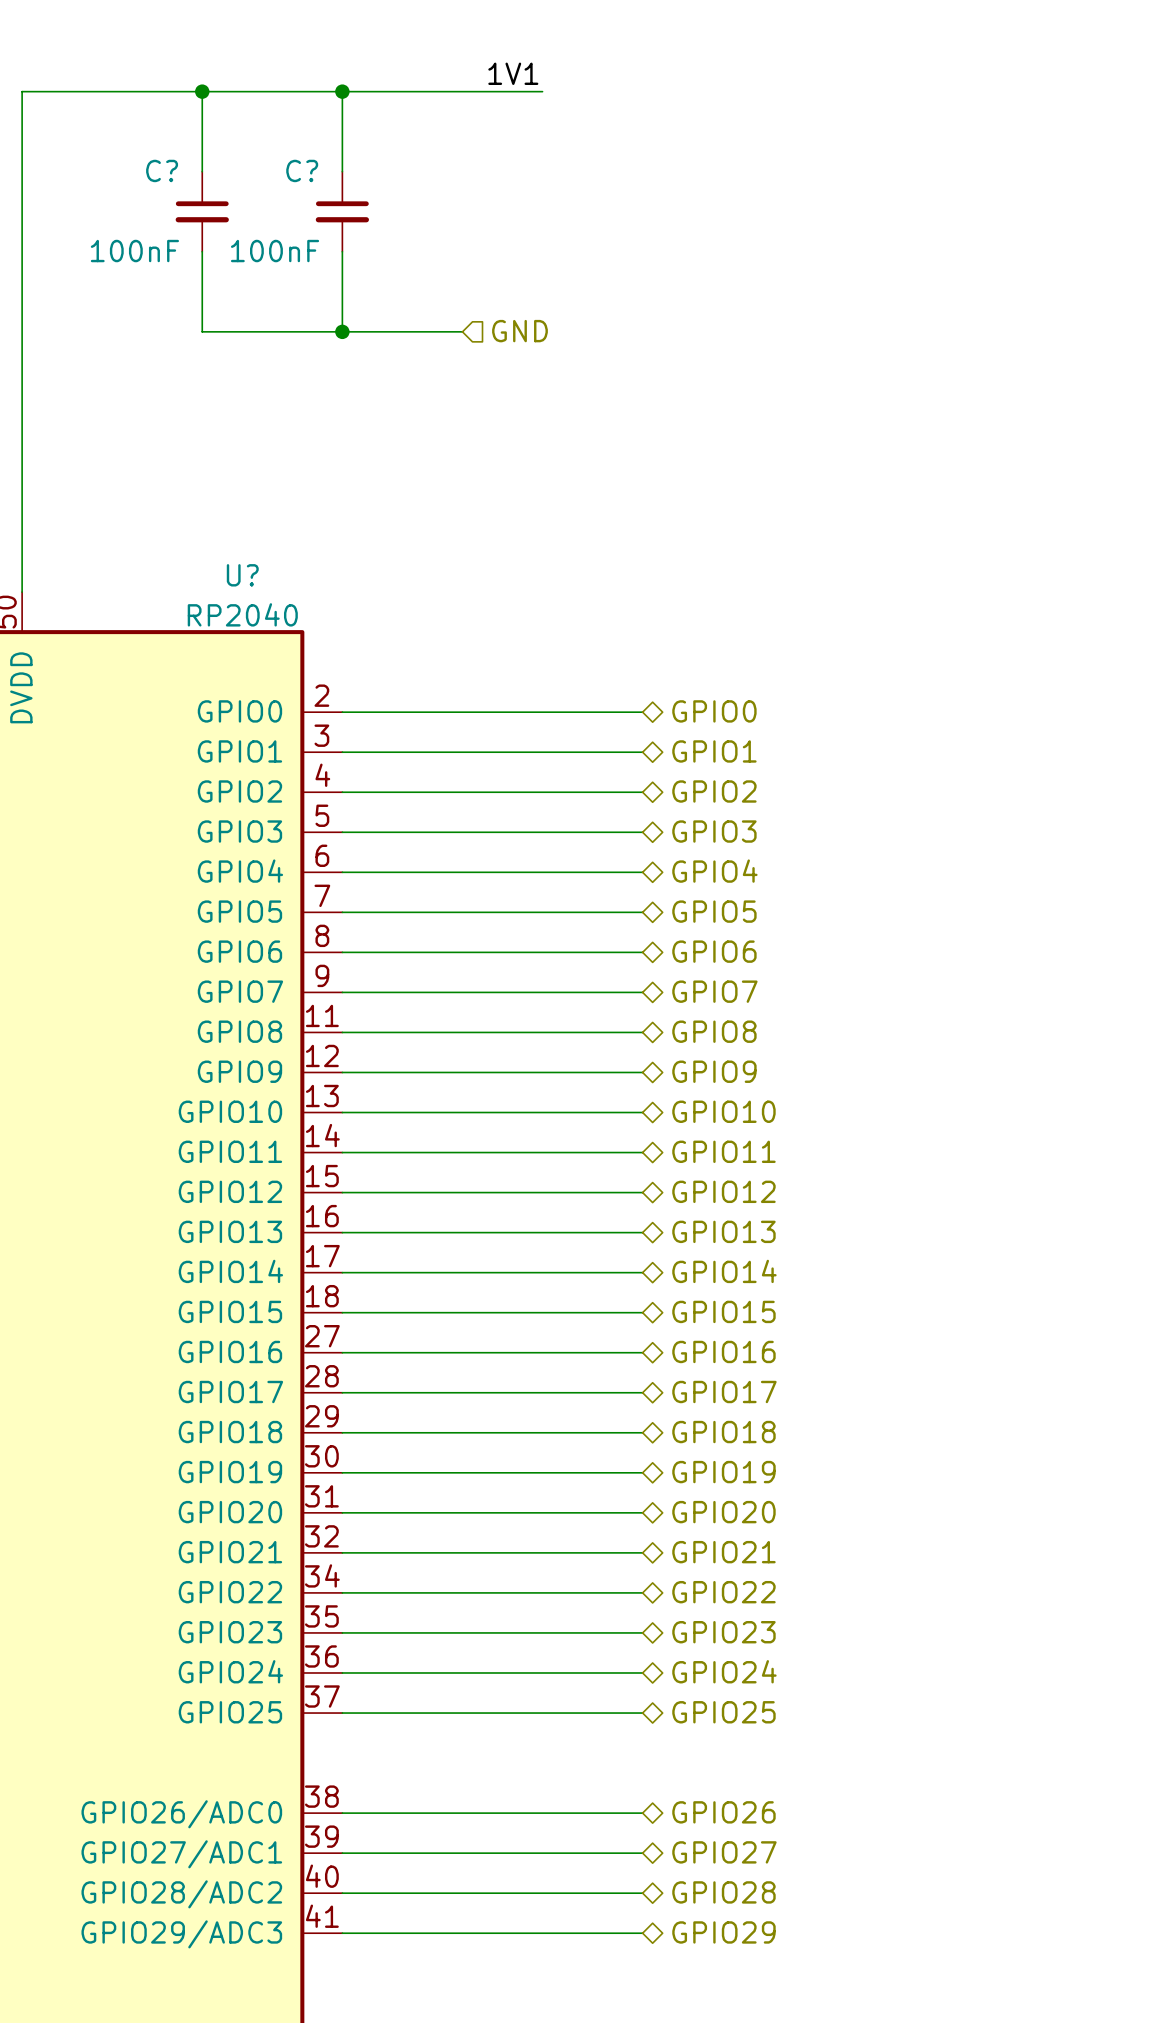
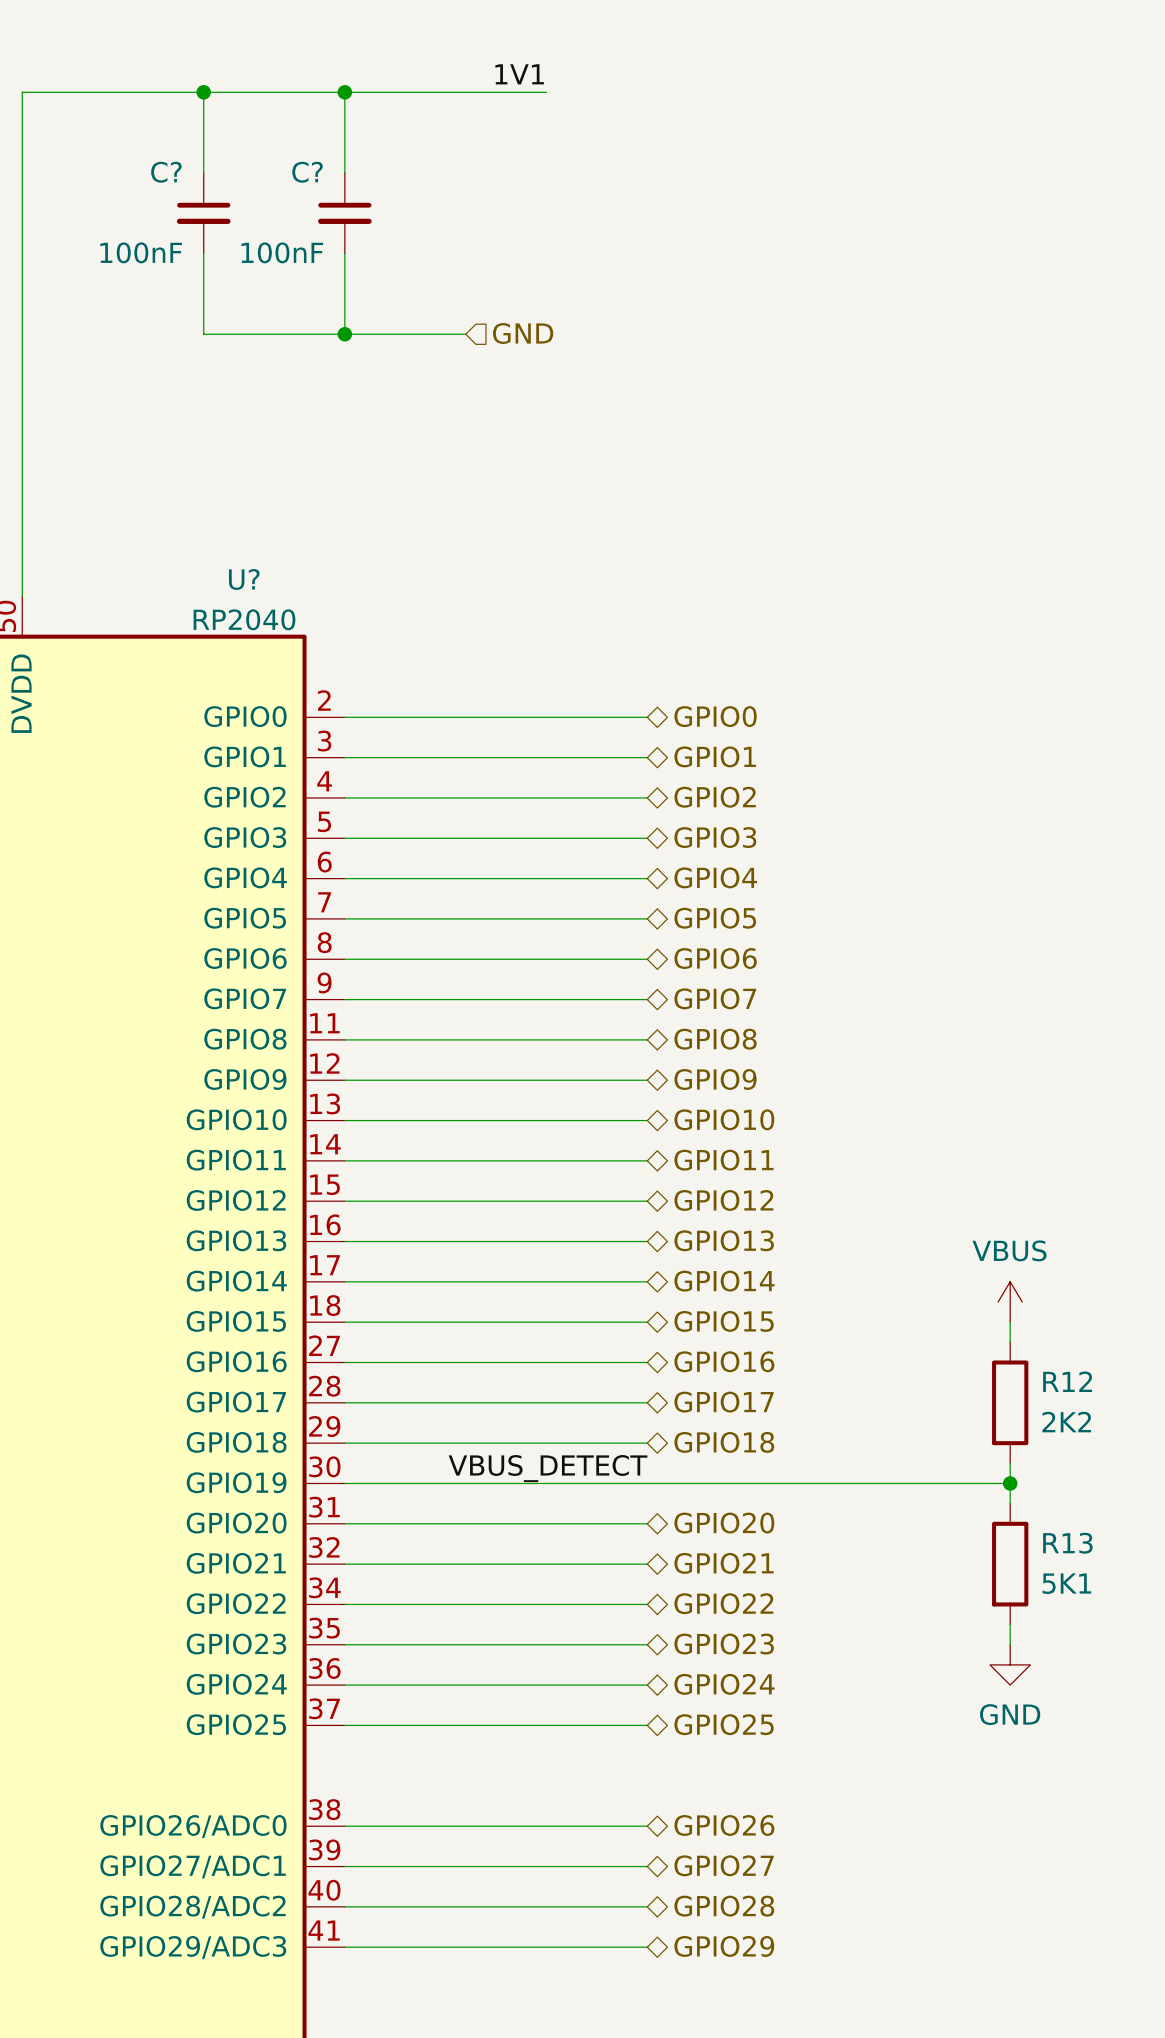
power symbol: none -> VBUS (1010, 1302)
wire: none -> (1010, 1322) (1010, 1342)
R12: none -> 2K2 (1010, 1402)
wire: none -> (1010, 1463) (1010, 1503)
label: none -> VBUS_DETECT (548, 1468)
wire: none -> (647, 1483) (1010, 1483)
hierarchical label: GPIO19 (723, 1472) -> none
junction: none -> (1010, 1483)
R13: none -> 5K1 (1010, 1564)
wire: none -> (1010, 1624) (1010, 1644)
power symbol: none -> GND (1010, 1664)

